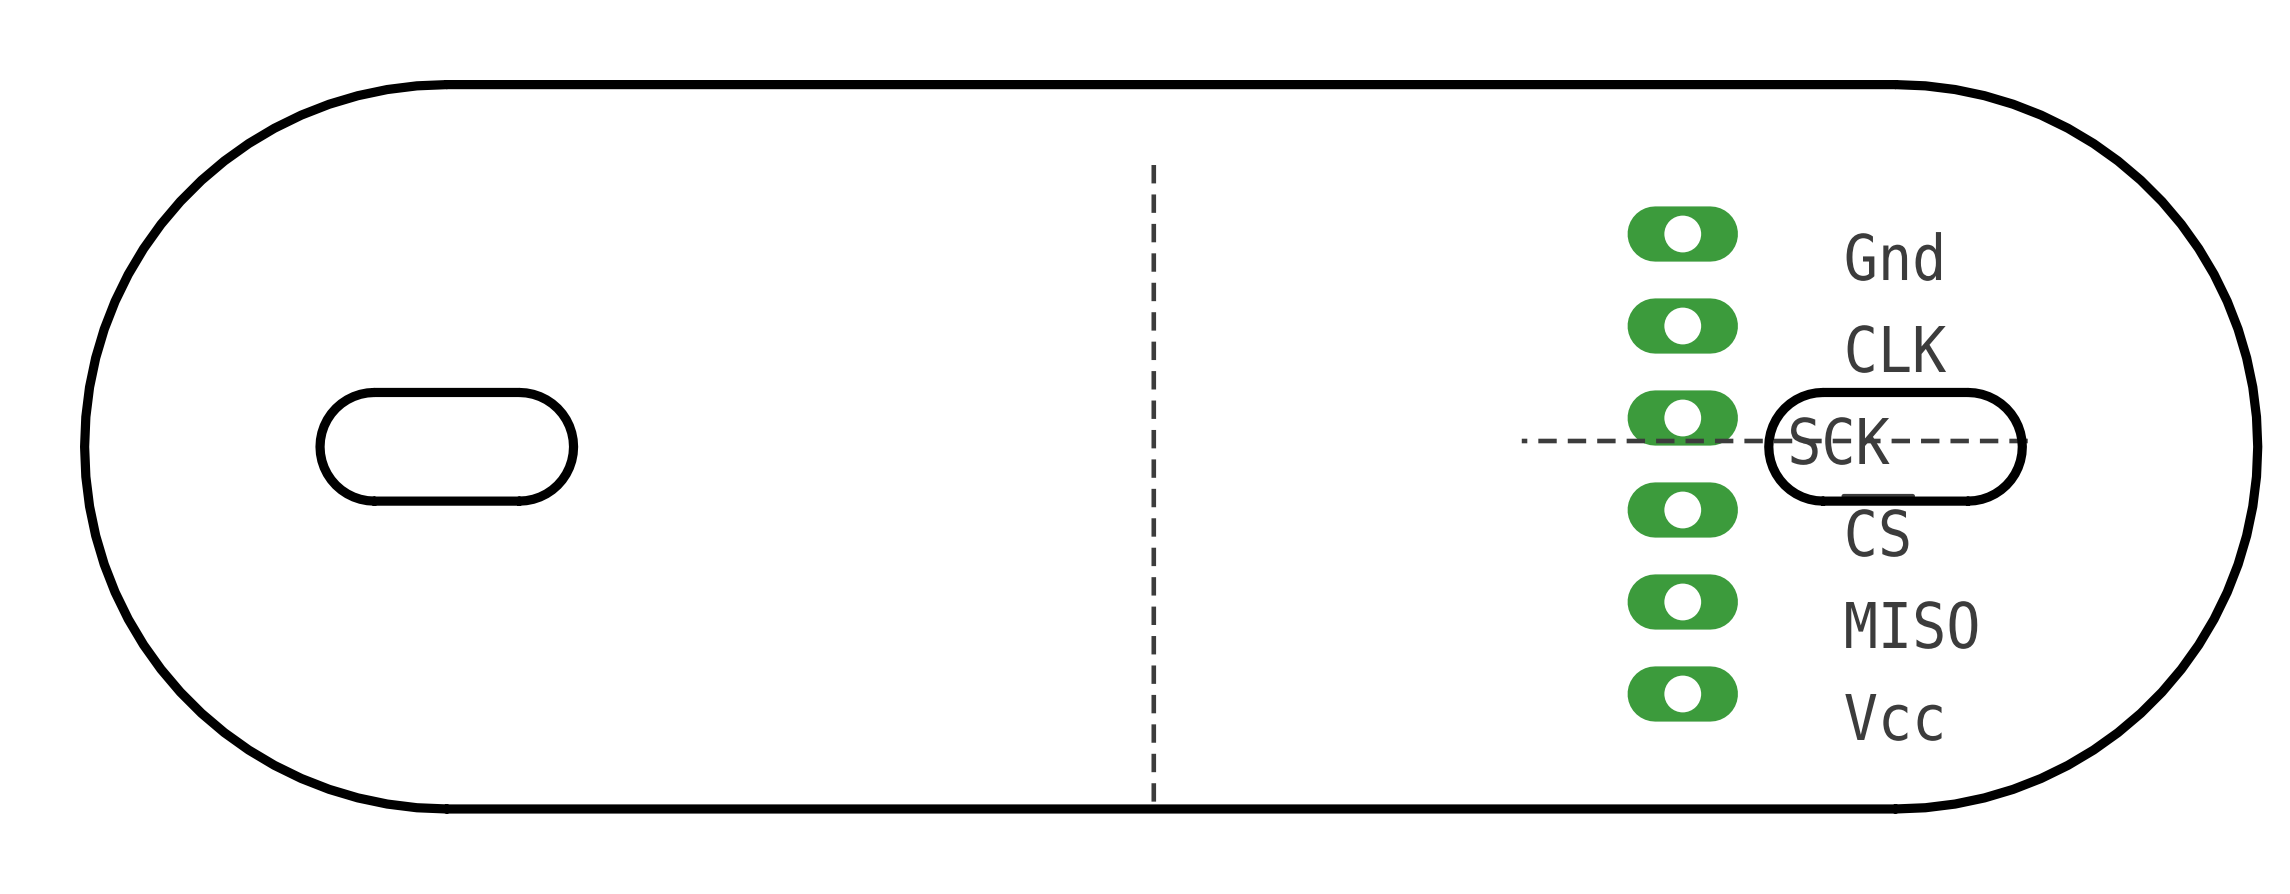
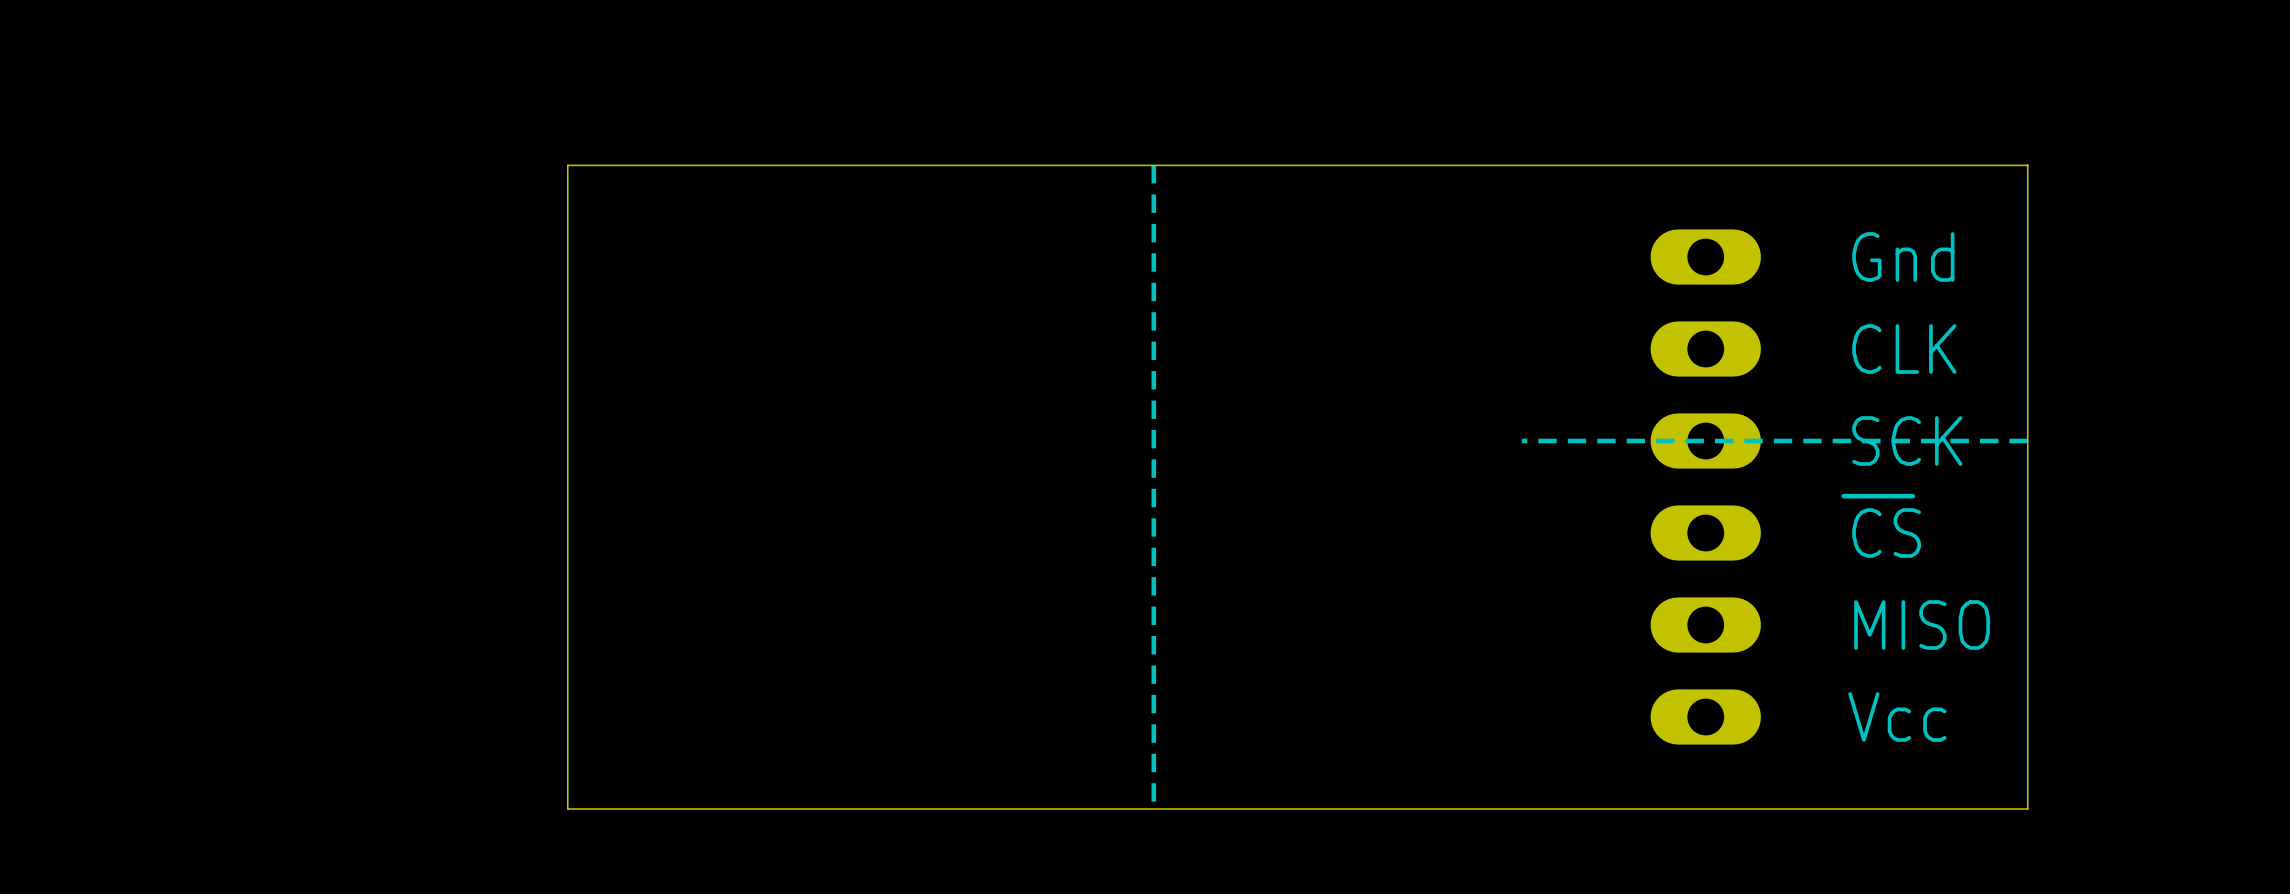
board edge: none -> (2027, 165) (2027, 808) (1895, 808)
board edge: (519, 392) (374, 392) (353, 396) (335, 408) (324, 426) (320, 446) (324, 467) (331, 479) (341, 489) (353, 496) (367, 500) (519, 501) (540, 496) (557, 485) (566, 473) (573, 453) (573, 439) (569, 426) (557, 408) (540, 396) (519, 392) -> none
board edge: (1967, 392) (1823, 392) (1802, 396) (1784, 408) (1772, 426) (1768, 446) (1772, 467) (1780, 479) (1790, 489) (1802, 496) (1816, 500) (1967, 501) (1988, 496) (2006, 485) (2015, 473) (2021, 453) (2021, 439) (2018, 426) (2006, 408) (1988, 396) (1967, 392) -> none
text position: SCK (1840, 441) -> SCK (1907, 441)
part position: (1682, 464) -> (1705, 486)
board edge: (1895, 808) (1955, 804) (2013, 789) (2067, 765) (2118, 732) (2162, 692) (2198, 644) (2227, 592) (2246, 535) (2256, 476) (2256, 416) (2246, 357) (2227, 301) (2198, 248) (2162, 201) (2140, 180) (2093, 143) (2041, 115) (1984, 95) (1955, 89) (1895, 84) (446, 84) (387, 89) (329, 104) (301, 115) (248, 143) (201, 180) (180, 201) (143, 248) (115, 301) (95, 357) (89, 387) (84, 446) (89, 506) (104, 564) (128, 619) (160, 669) (201, 713) (224, 732) (274, 765) (329, 789) (387, 804) (446, 808) (567, 808) -> (2027, 165) (567, 165) (567, 808)
board edge width: thick (1895, 808) (567, 808) -> thin (1895, 808) (567, 808)

